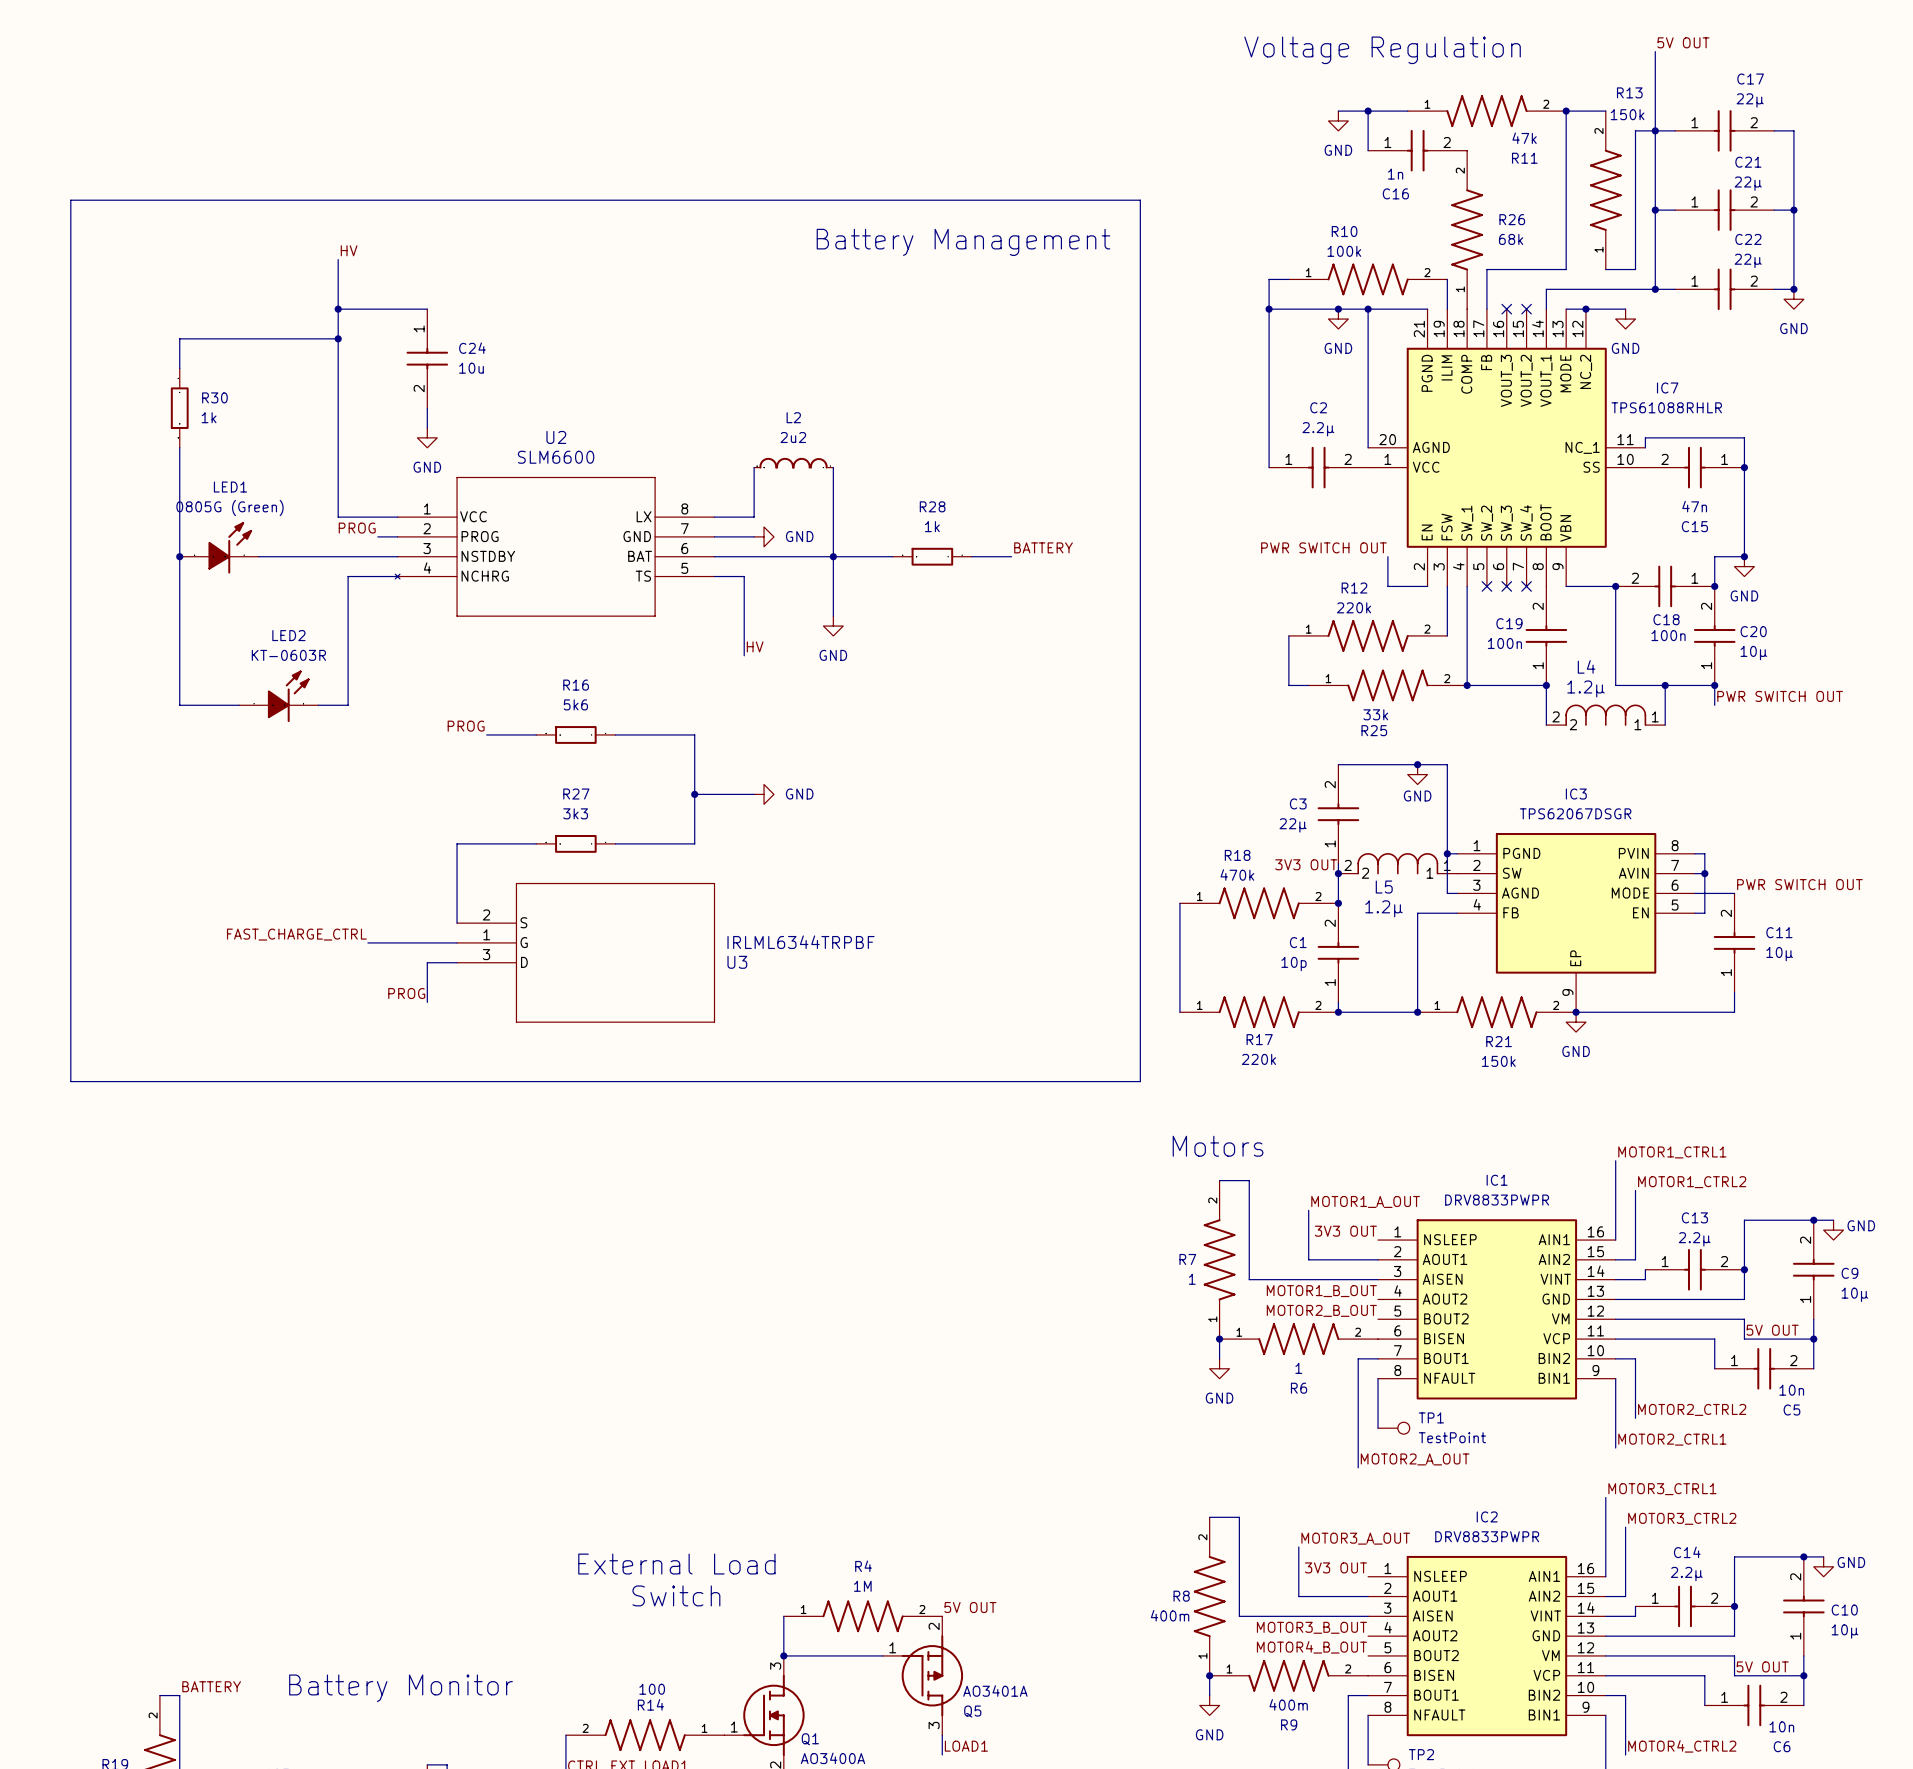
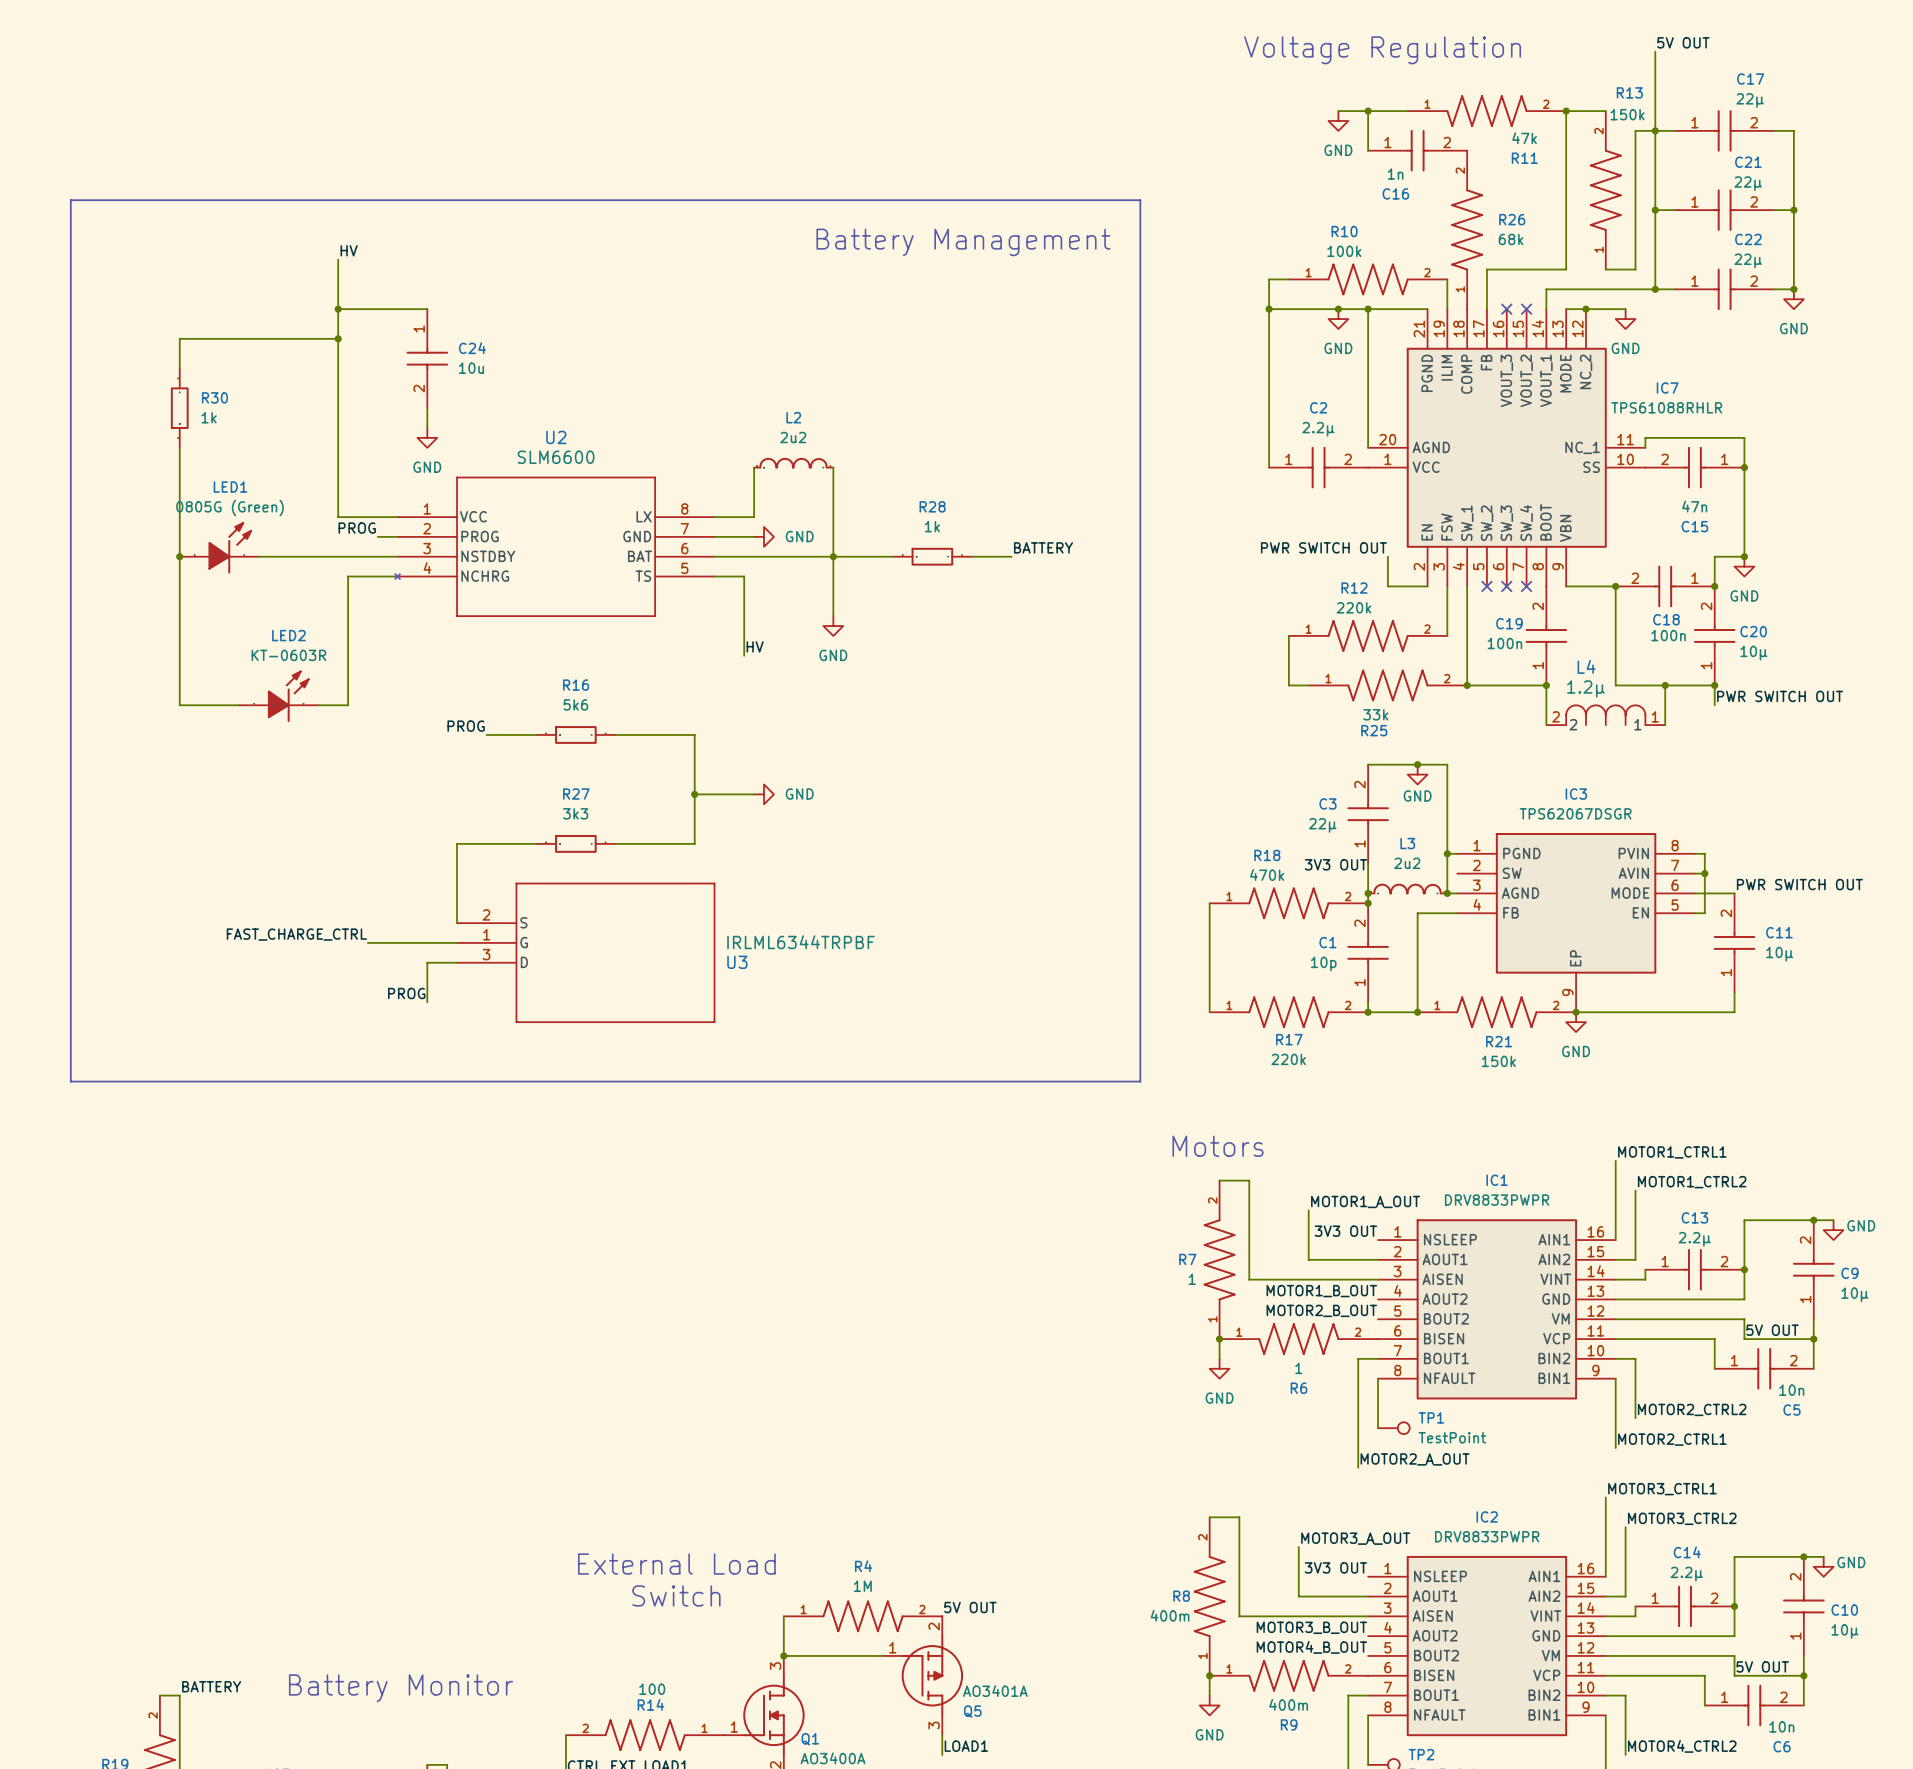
wire: (1338, 764) (1368, 764) -> none
C3 position: (1338, 814) -> (1368, 814)
wire: (1338, 863) (1338, 903) -> (1368, 863) (1368, 903)
L5: 1.2µ (1397, 863) -> none
label position: 3V3 OUT (1306, 864) -> 3V3 OUT (1335, 864)
junction: (1338, 873) -> none
L3: none -> 2u2 (1407, 889)
junction: none -> (1368, 893)
junction: none -> (1447, 893)
wire: (1179, 903) (1179, 1012) -> (1209, 903) (1209, 1012)
R18 position: (1259, 903) -> (1288, 903)
junction: (1338, 903) -> none
junction: none -> (1368, 903)
C1 position: (1338, 952) -> (1368, 952)
R17 position: (1259, 1012) -> (1288, 1012)
junction position: (1338, 1012) -> (1368, 1012)

